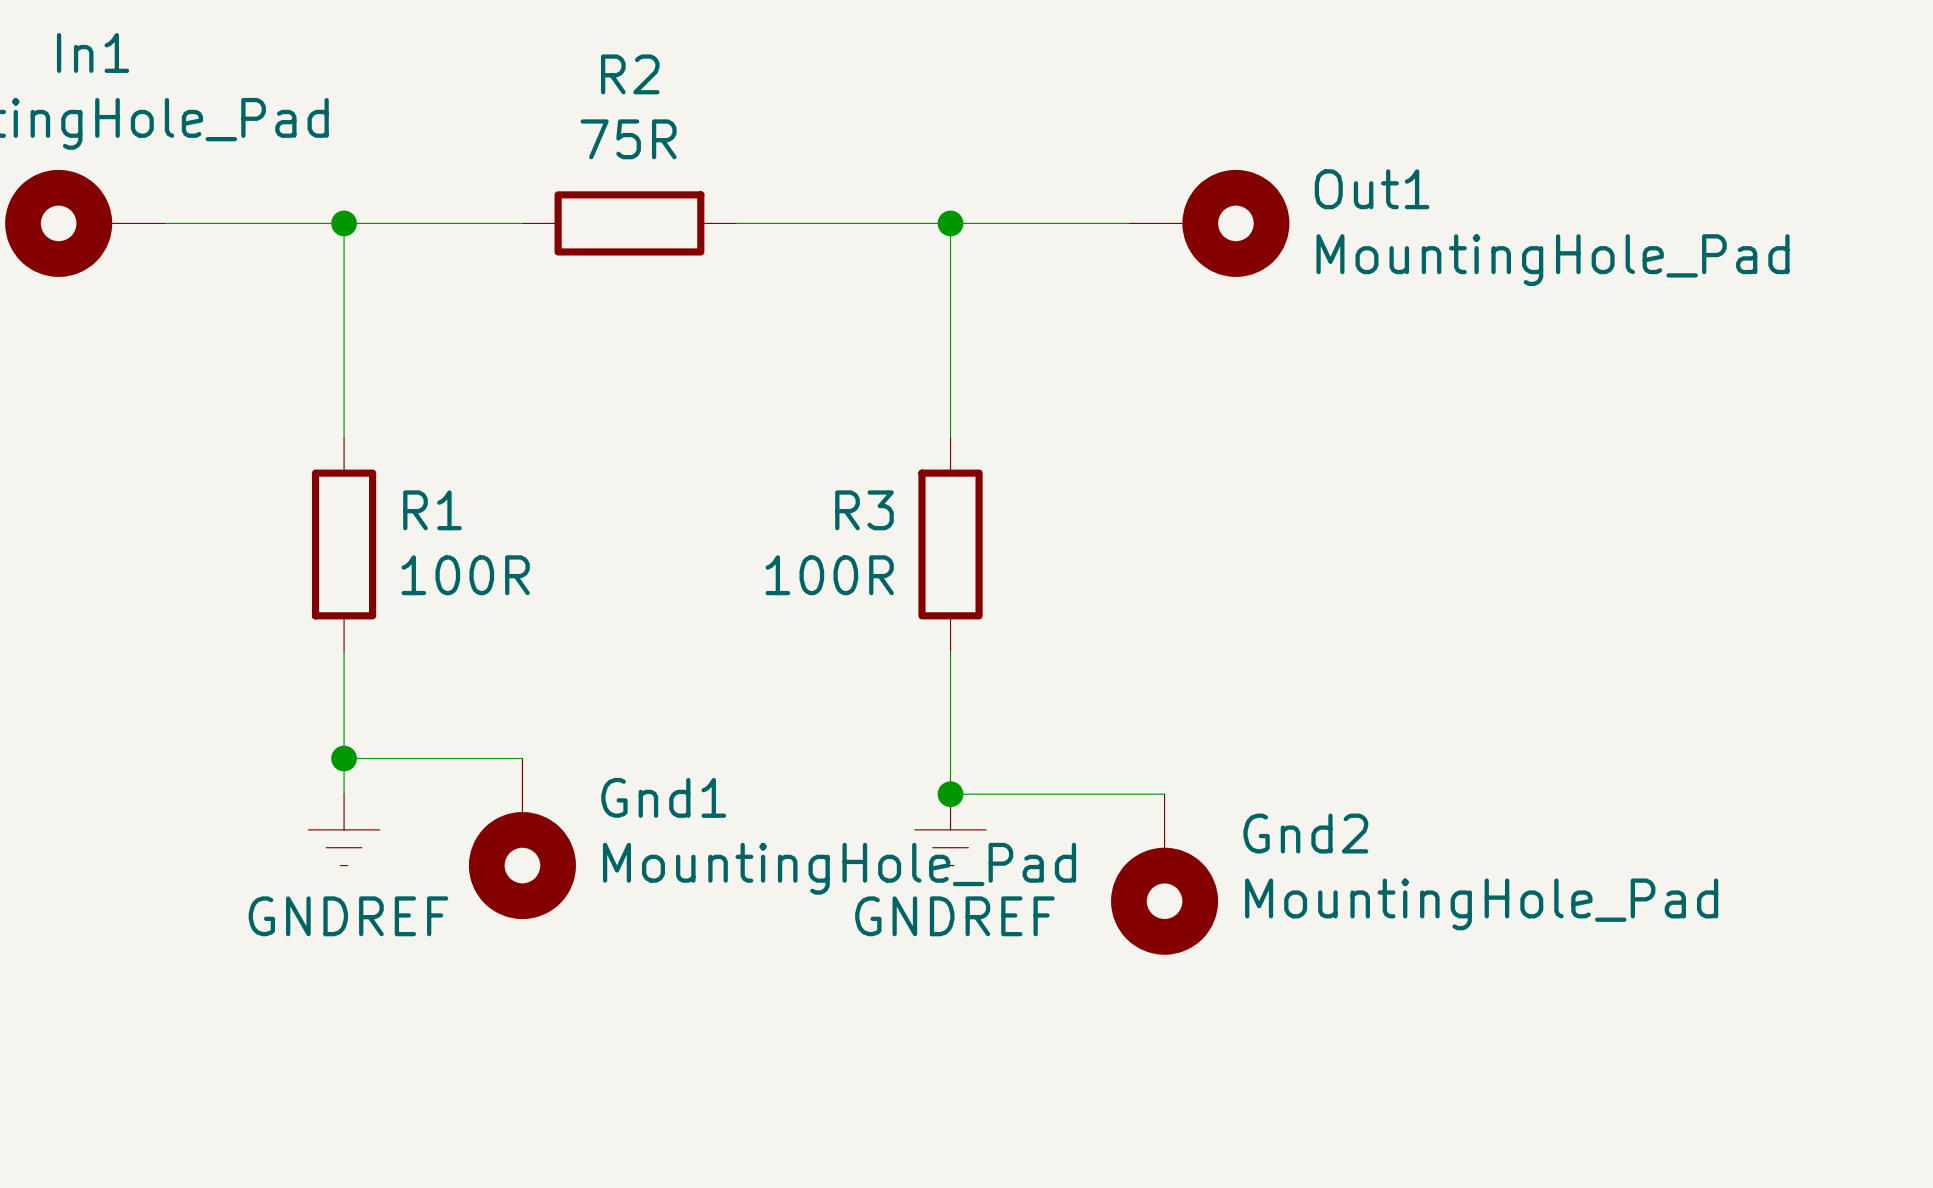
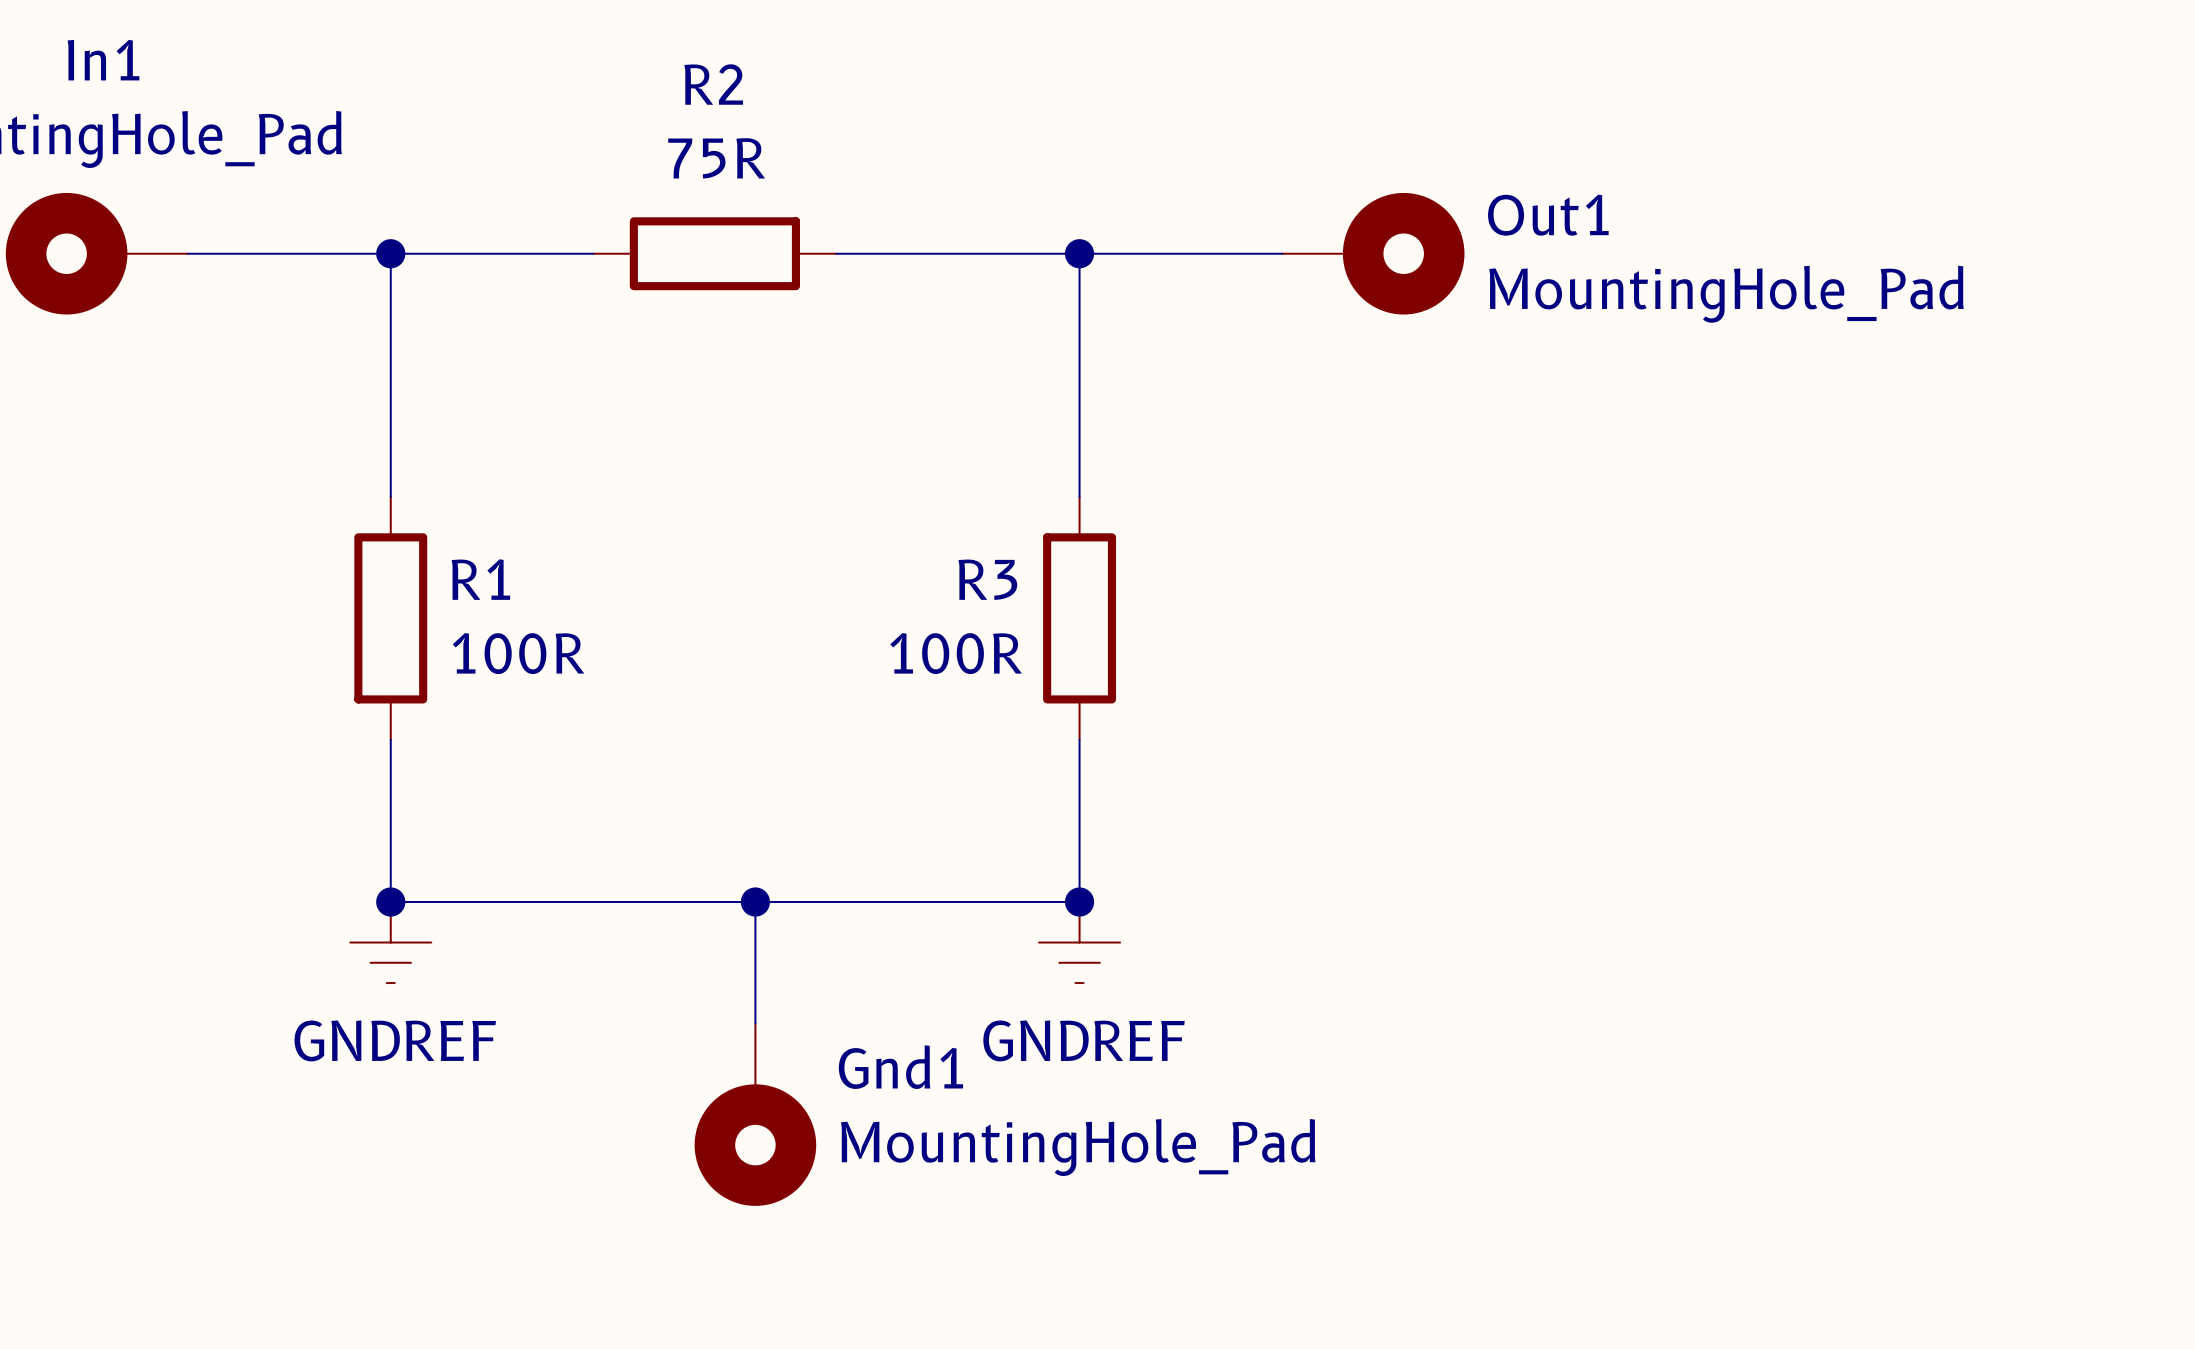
wire: (344, 758) (522, 758) -> none
junction position: (344, 758) -> (390, 902)
wire: none -> (755, 902) (755, 1023)
junction: none -> (755, 902)
wire: (950, 794) (1164, 794) -> (1079, 902) (390, 902)
Gnd1 position: (522, 838) -> (755, 1114)
Gnd2: MountingHole_Pad (1164, 874) -> none

